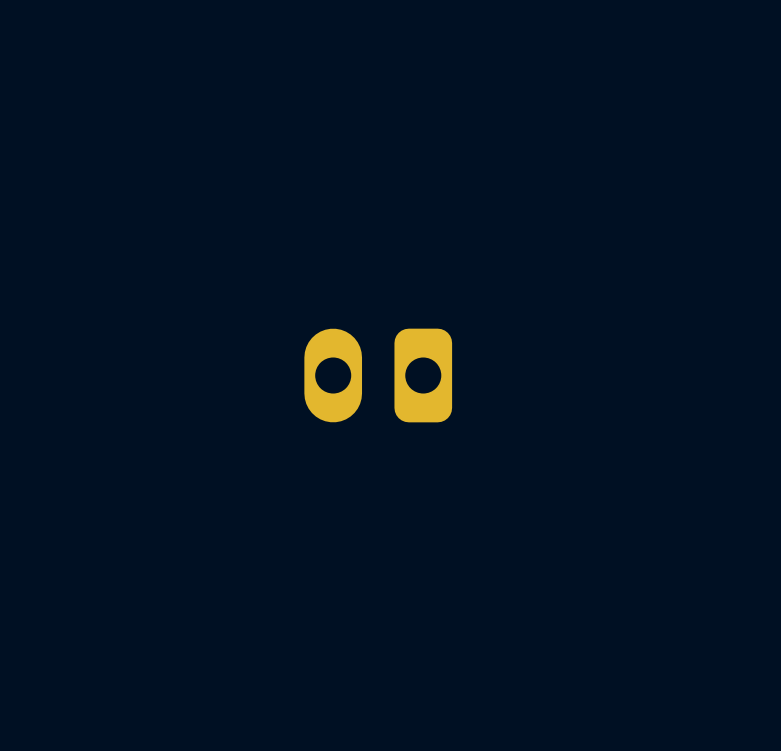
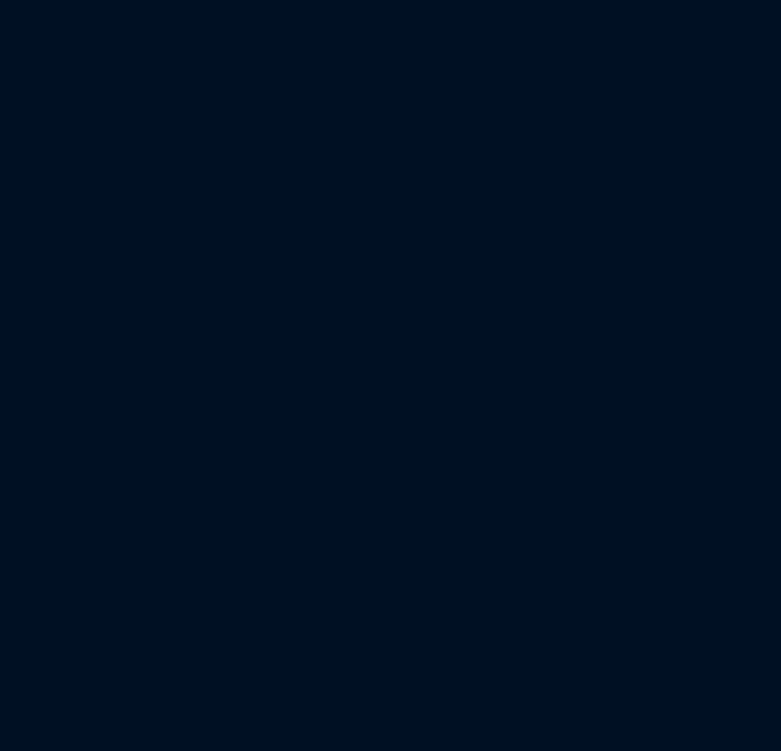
part: (378, 375) -> none

